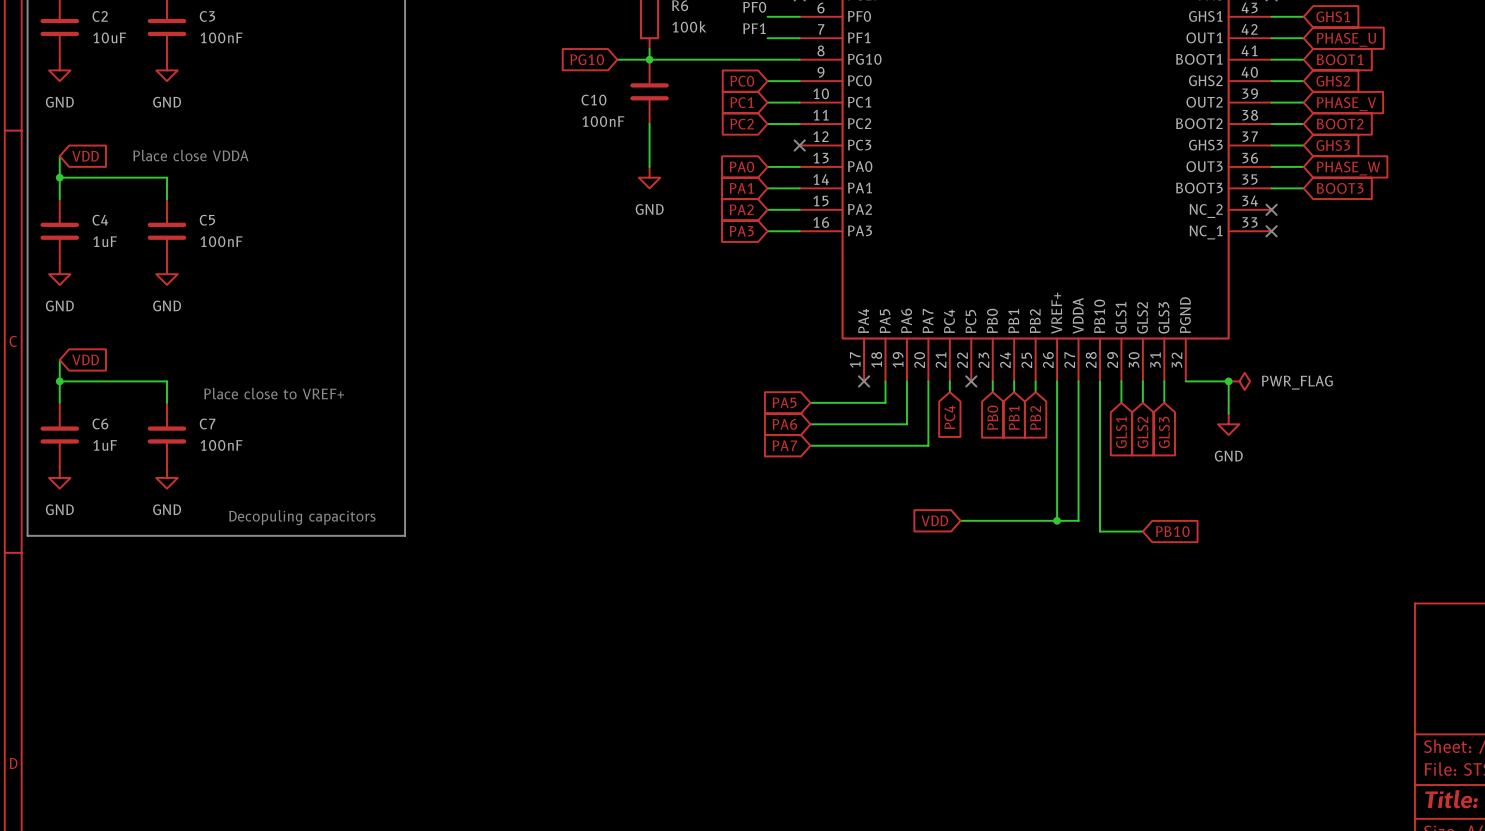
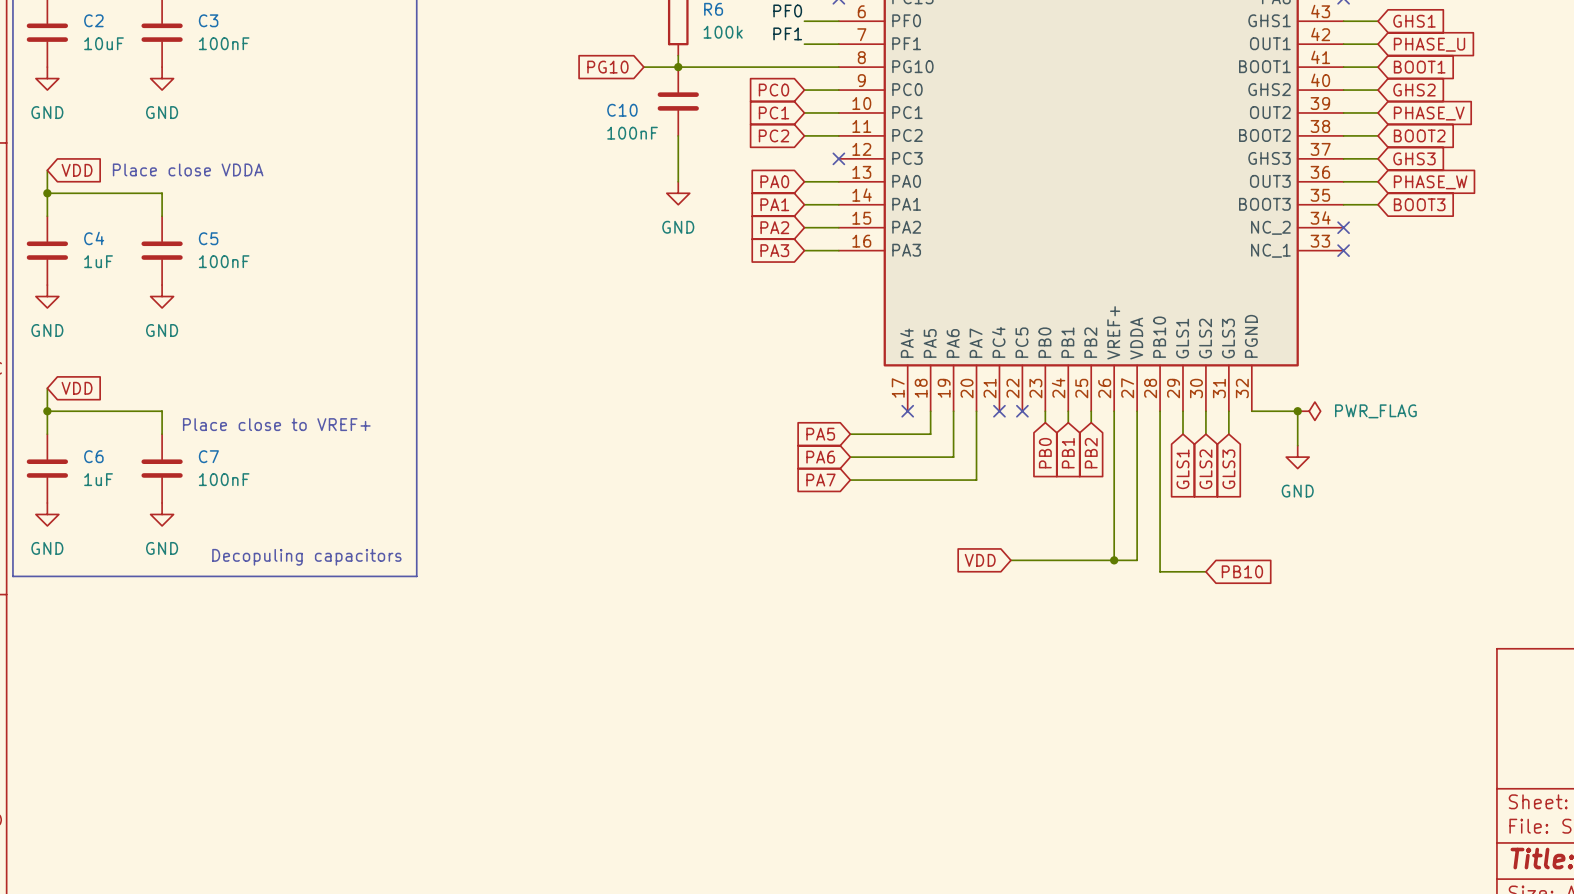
wire: (949, 381) (949, 392) -> none
no-connect mark: none -> (999, 411)
global label: PC4 (949, 417) -> none

